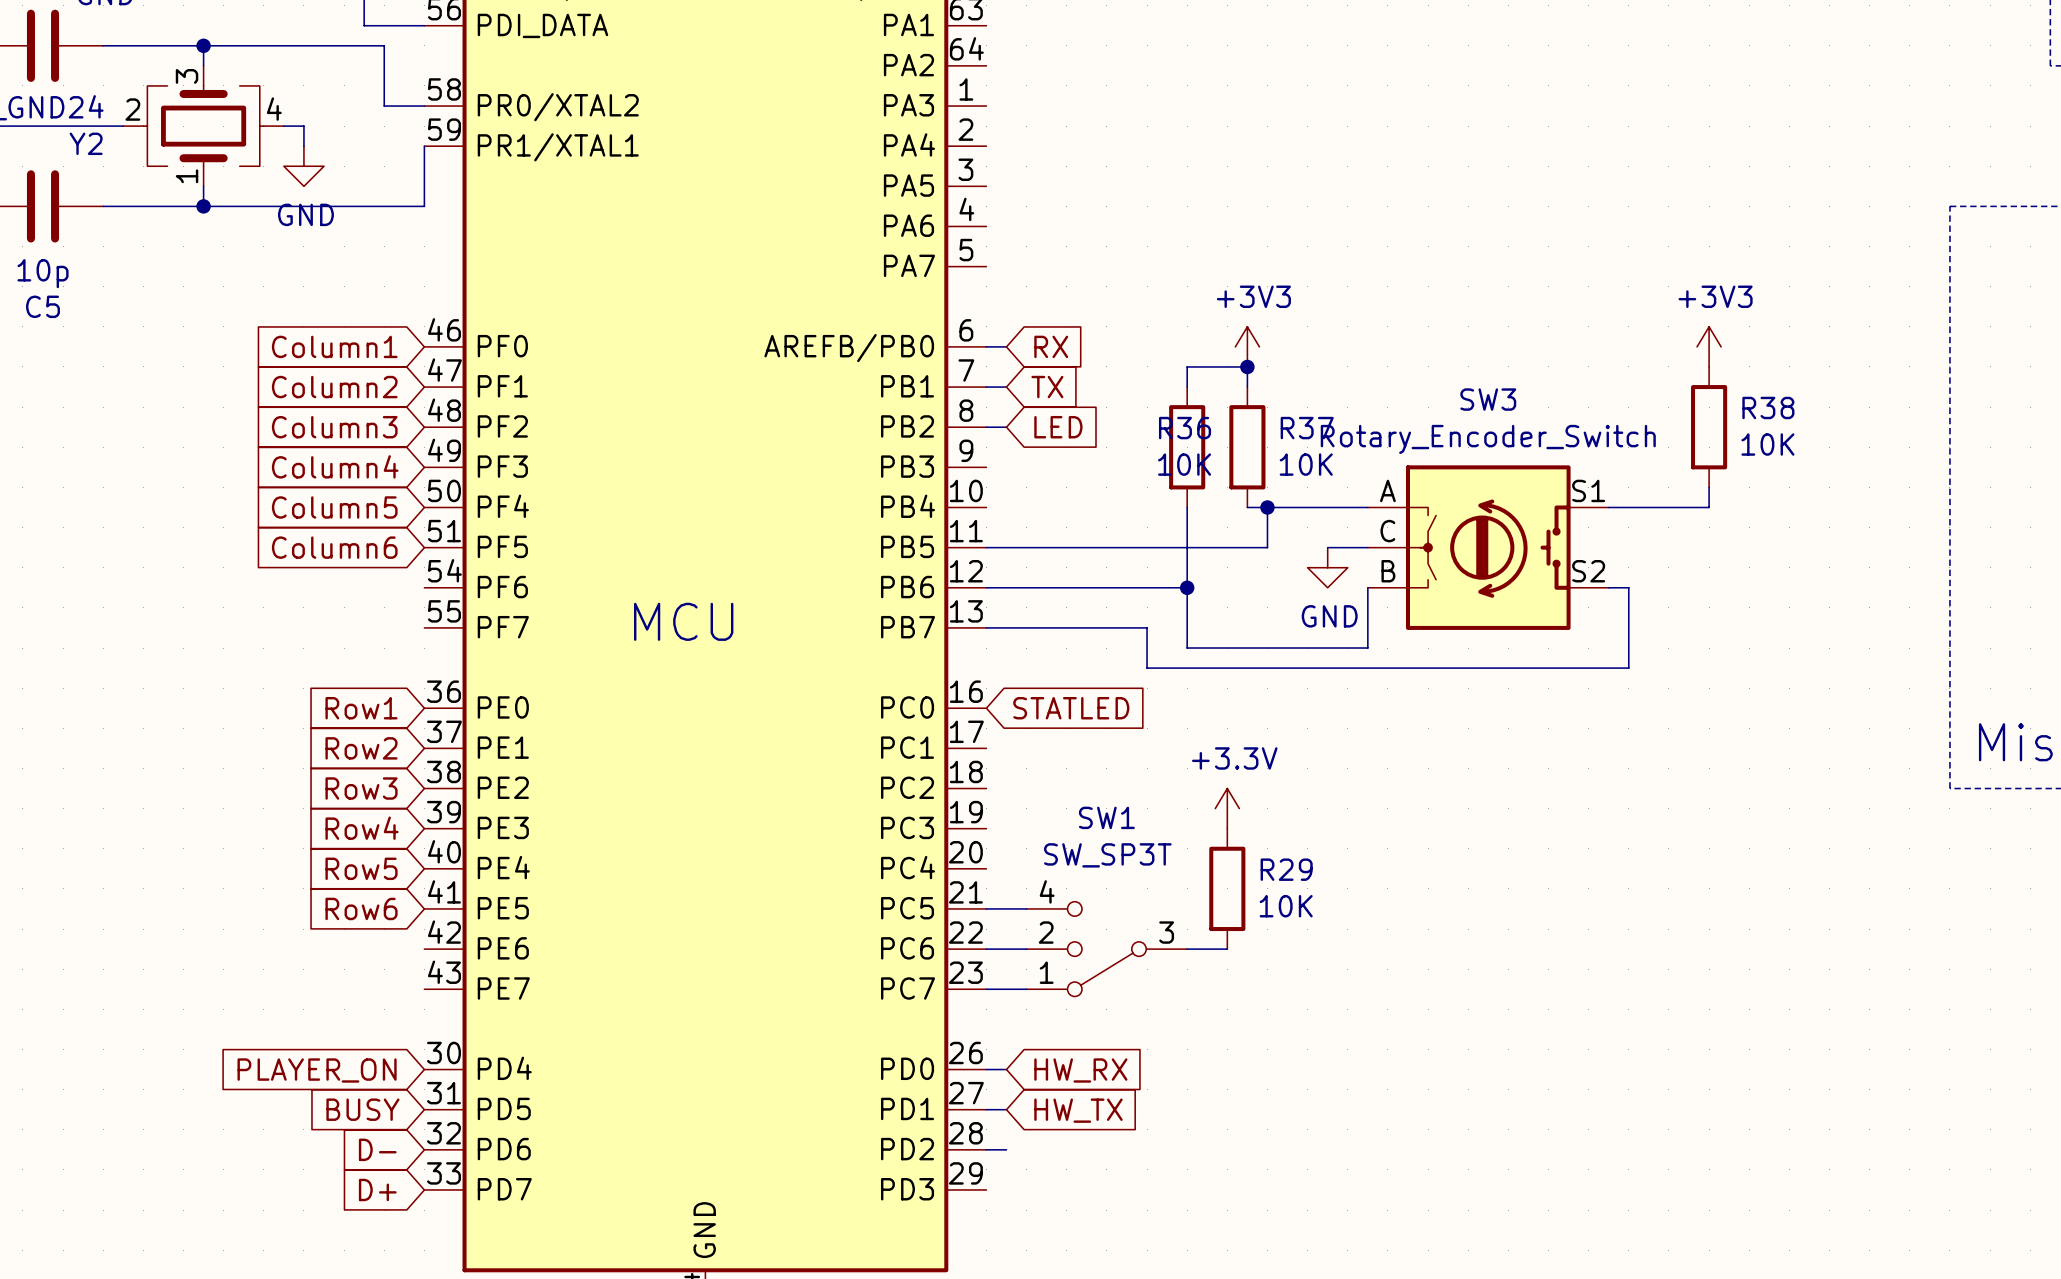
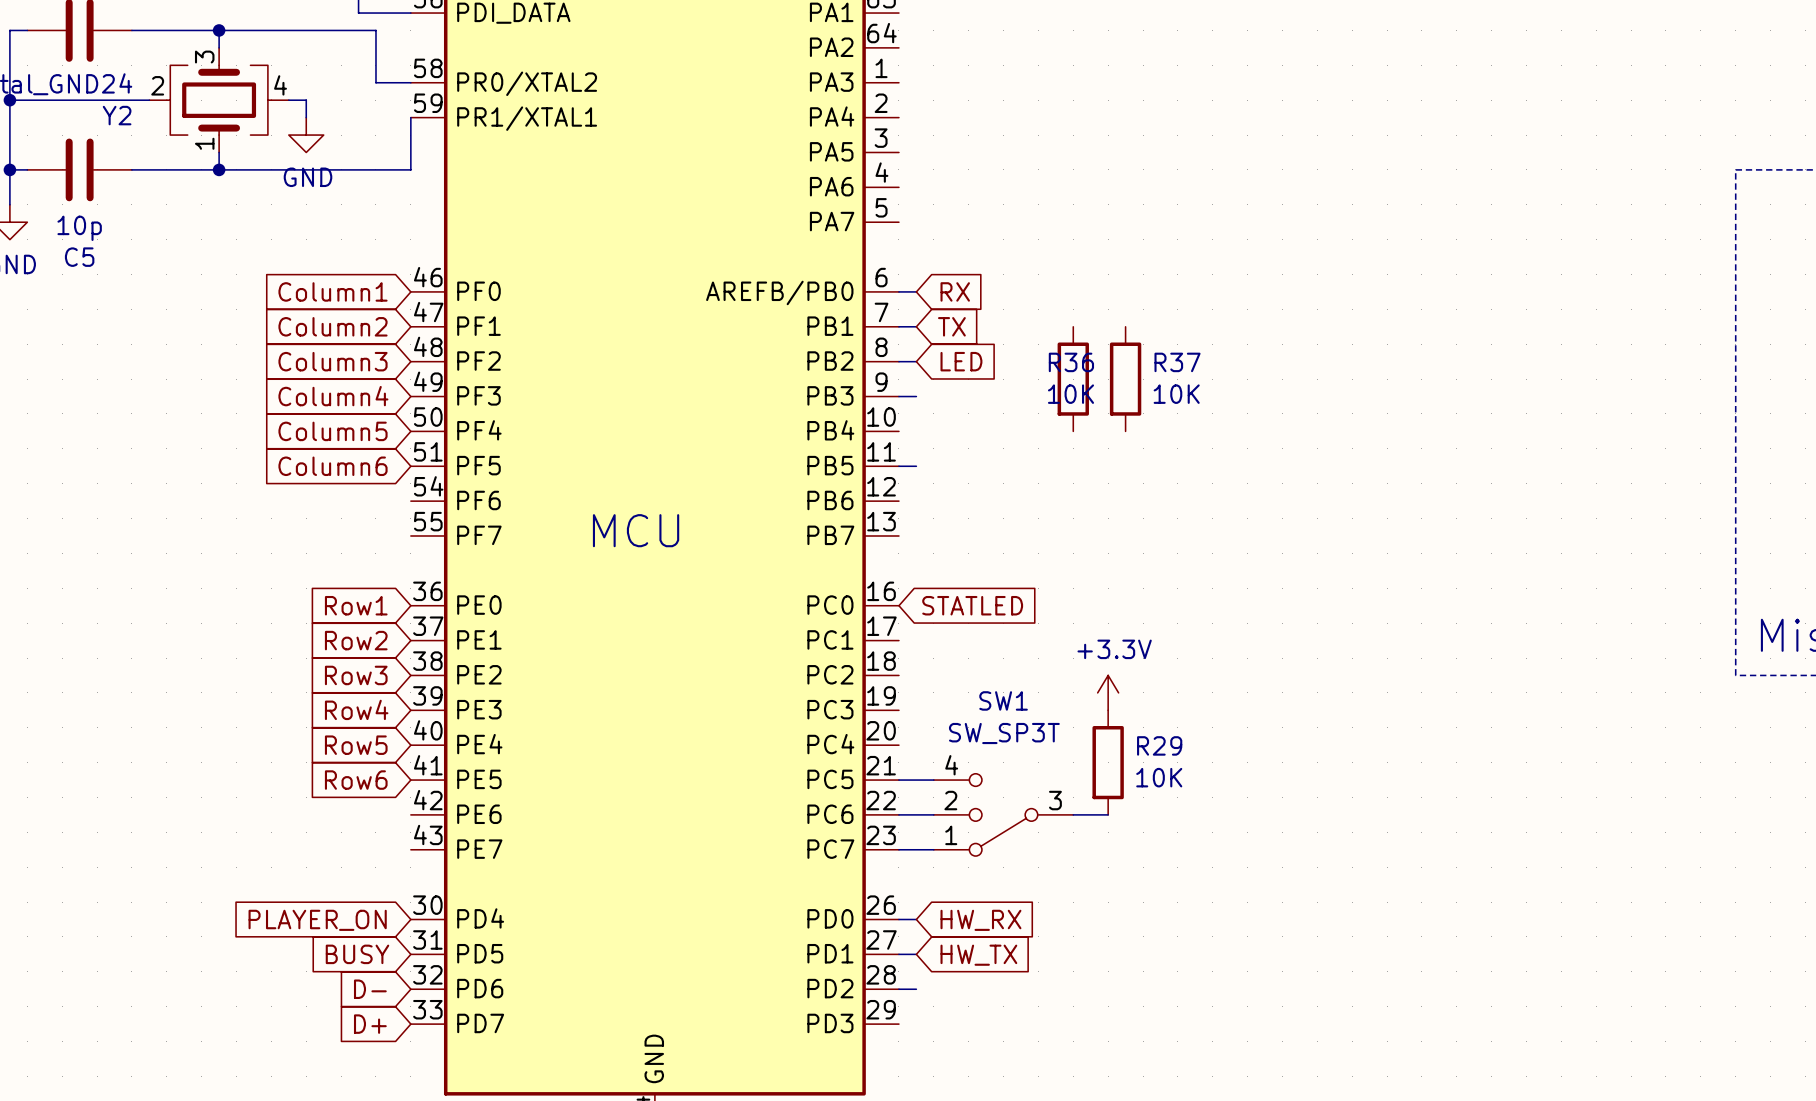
power symbol: +3V3 (1247, 346) -> none
power symbol: +3V3 (1709, 346) -> none
junction: (1247, 366) -> none
wire: (1187, 387) (1187, 366) (1247, 366) (1247, 387) -> none
R38: 10K (1709, 427) -> none
wire: none -> (898, 396) (916, 396)
wire: (1709, 487) (1709, 507) (1608, 507) -> none
wire: (1187, 507) (1187, 648) (1367, 648) (1367, 587) -> none
wire: (1247, 507) (1367, 507) -> none
wire: (1267, 507) (1267, 547) (1006, 547) -> none
junction: (1267, 507) -> none
wire: (1327, 547) (1367, 547) -> none
SW3: Rotary_Encoder_Switch (1488, 547) -> none
power symbol: GND (1327, 567) -> none
wire: (986, 587) (1187, 587) -> none
junction: (1187, 587) -> none
wire: (1608, 587) (1628, 587) (1628, 668) (1147, 668) (1147, 627) (986, 627) -> none

